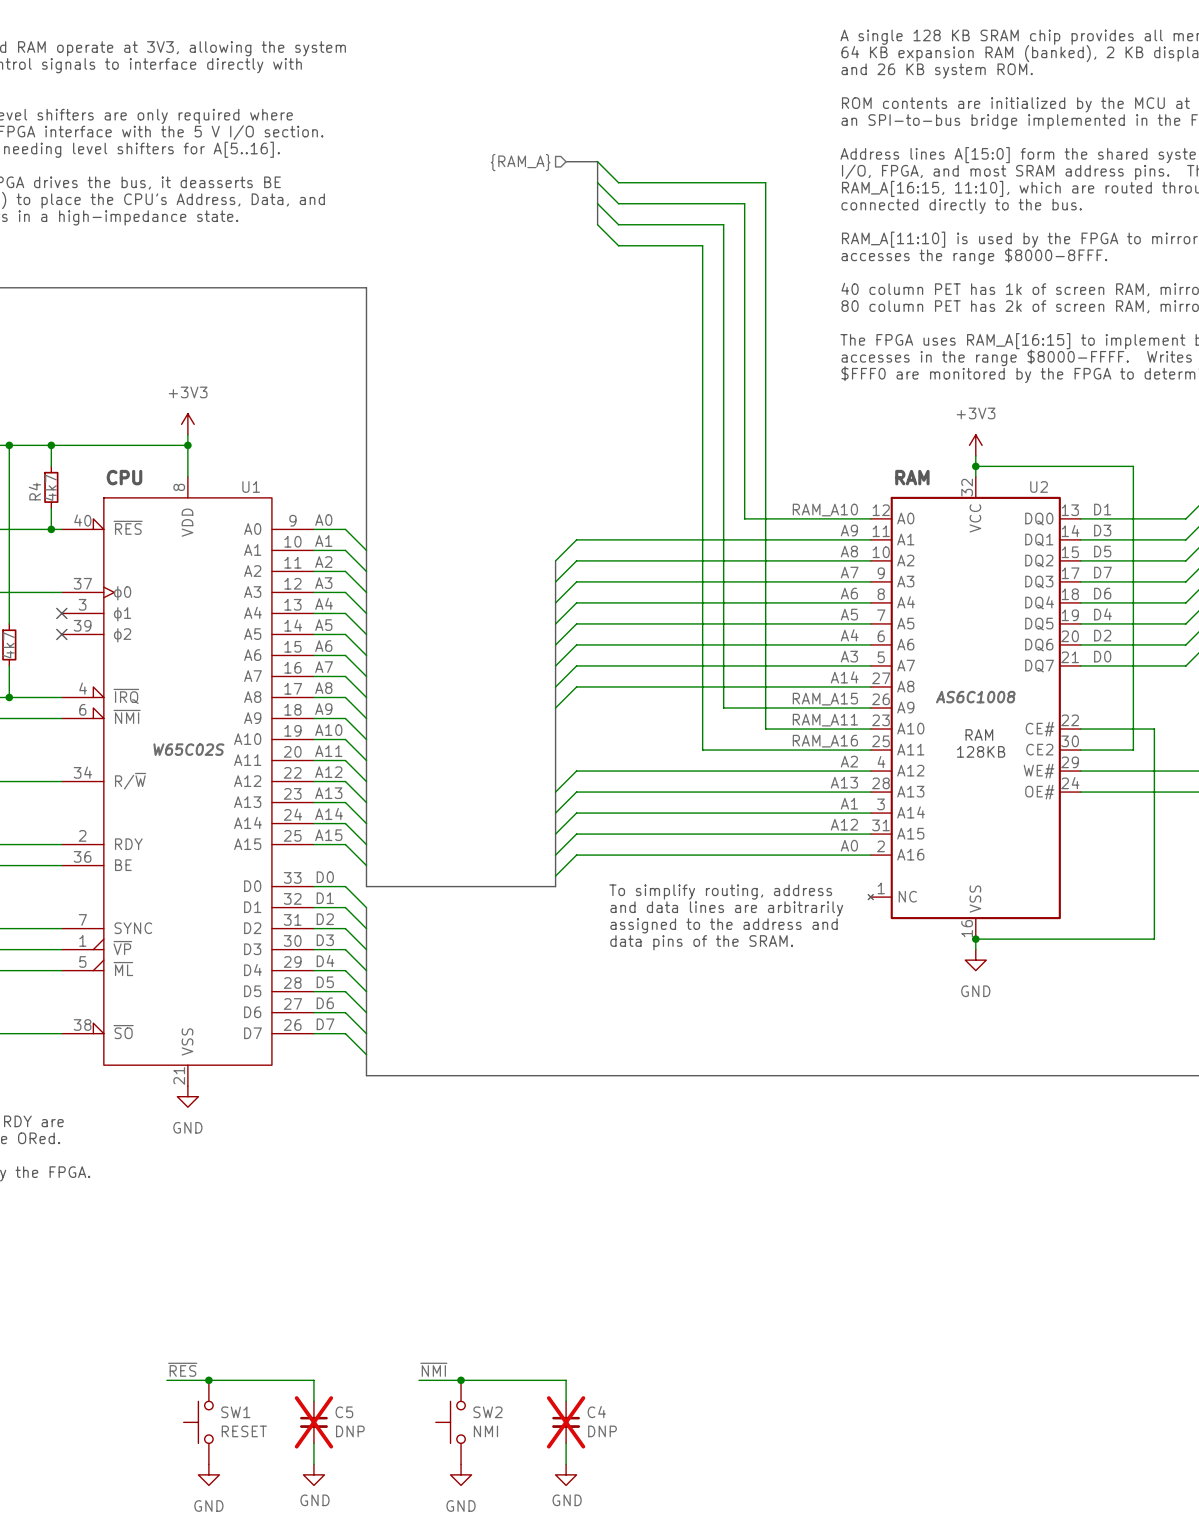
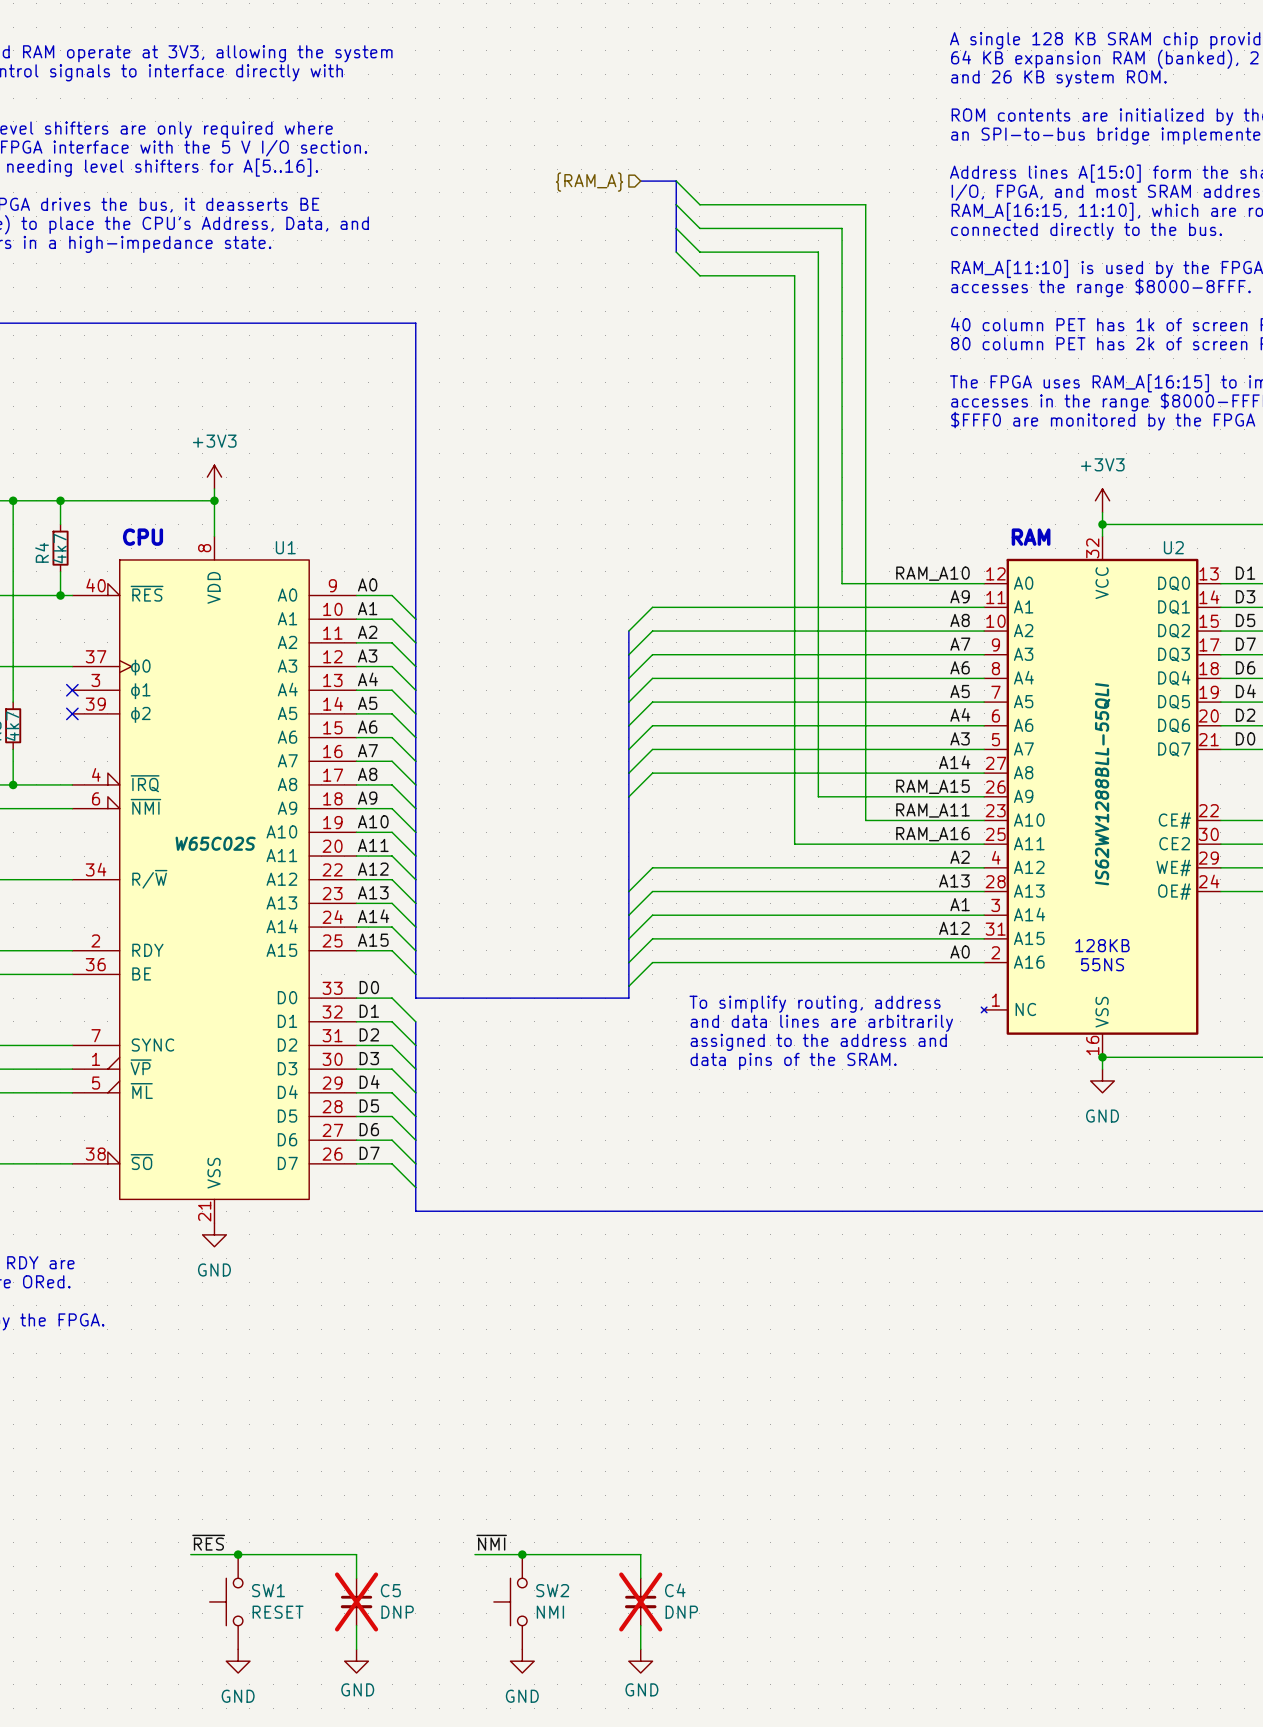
U2 value: AS6C1008 (975, 697) -> IS62WV1288BLL-55QLI (1102, 784)
text: RAM (979, 735) -> none
text position: 128KB (981, 751) -> 128KB (1102, 945)
text: none -> 55NS (1102, 964)

